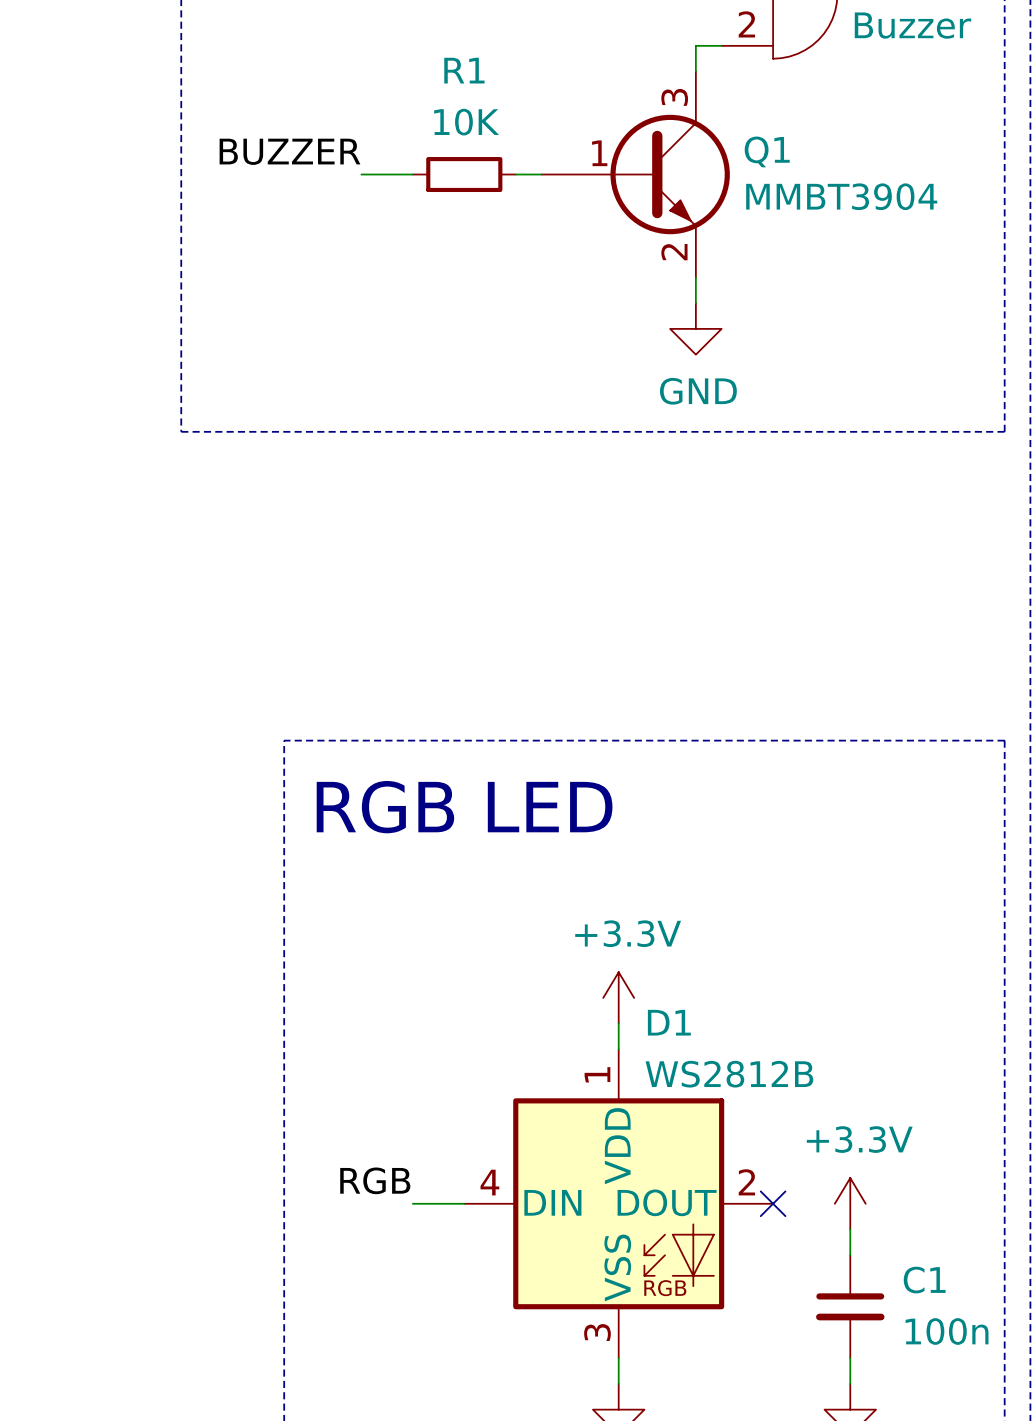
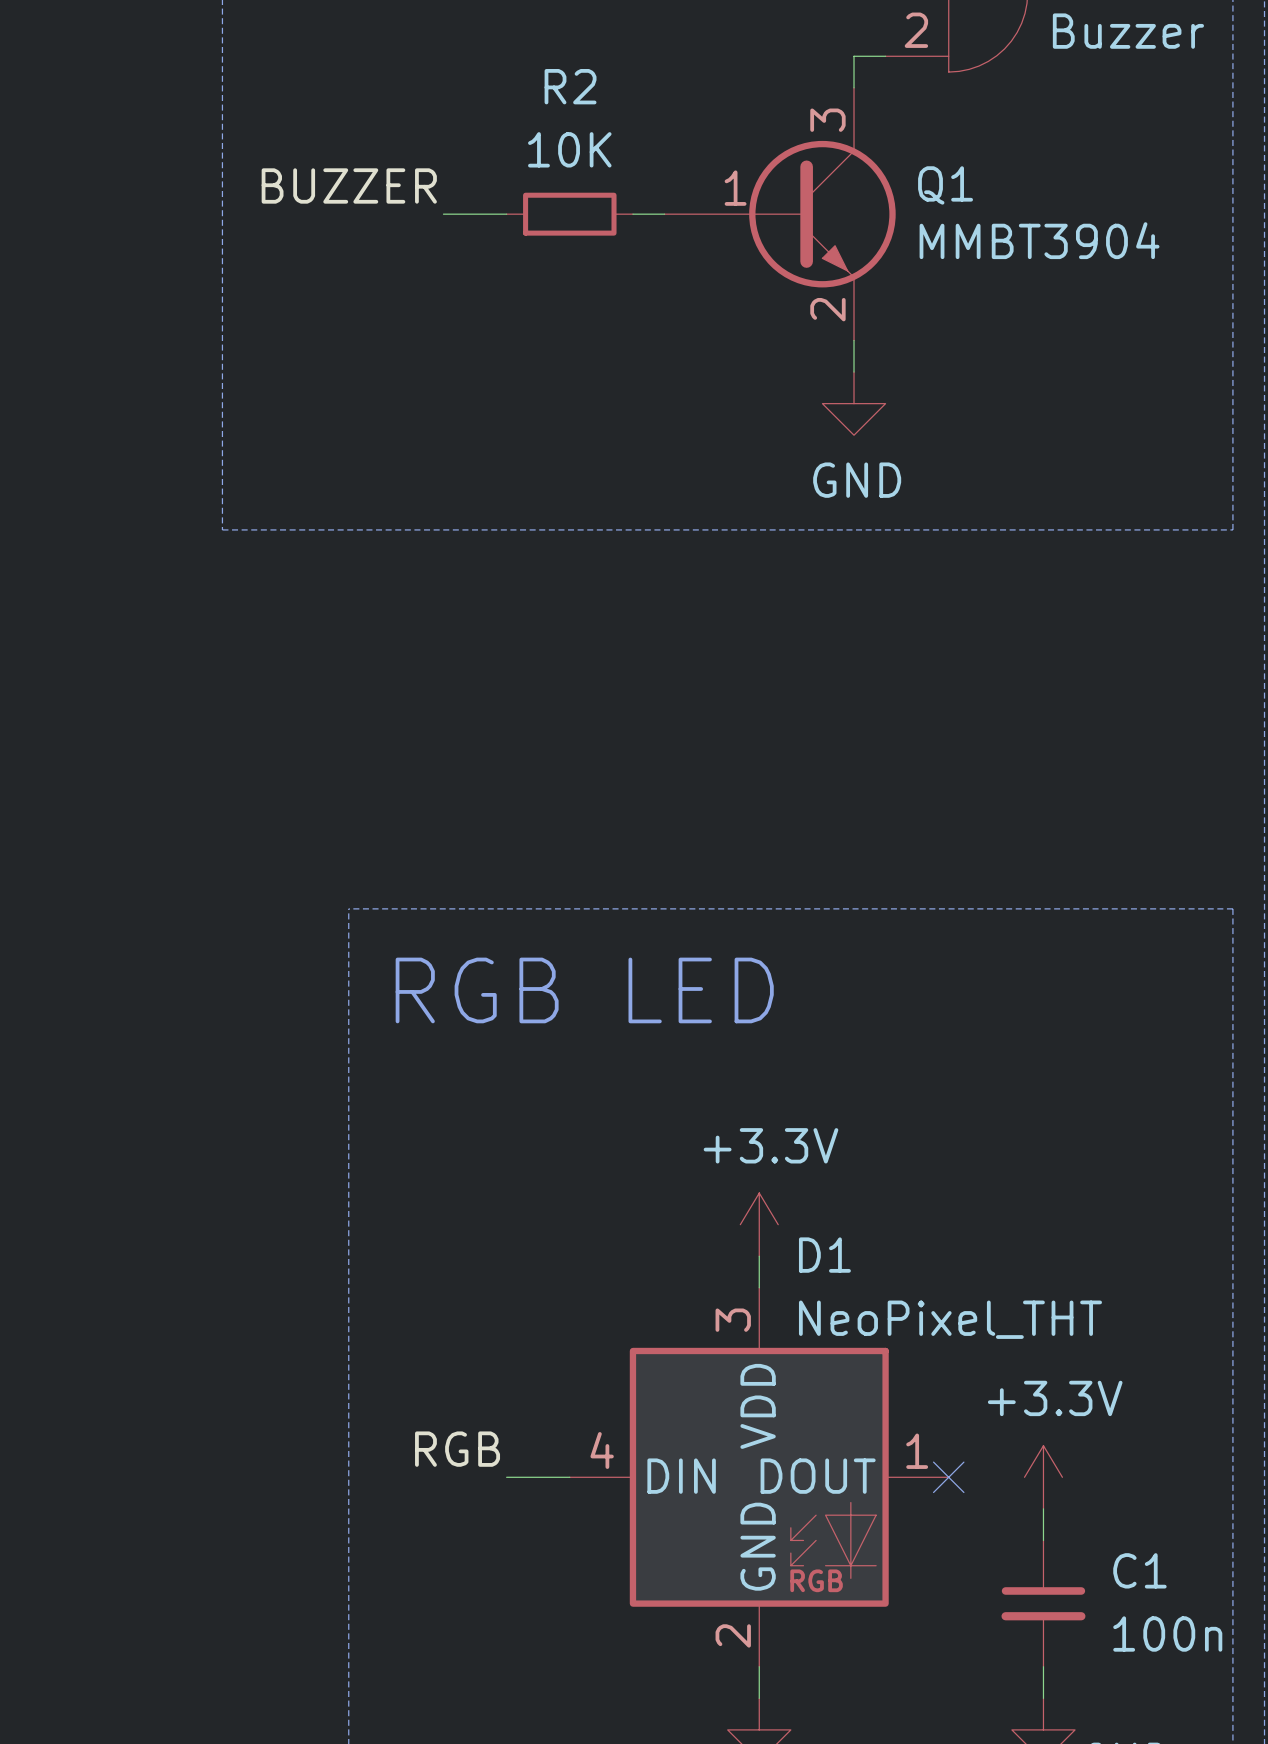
R1 name: R1 (464, 70) -> R2 (570, 86)
D1 pin number: 1 (597, 1074) -> 3 (733, 1320)
D1 value: WS2812B (729, 1074) -> NeoPixel_THT (950, 1319)
D1 pin number: 2 (746, 1182) -> 1 (917, 1451)
D1 pin name: VSS (617, 1267) -> GND (758, 1546)
D1 pin number: 3 (597, 1332) -> 2 (733, 1635)

